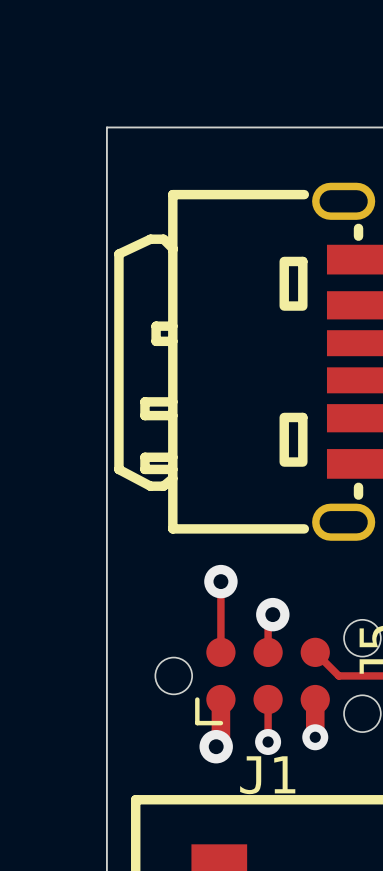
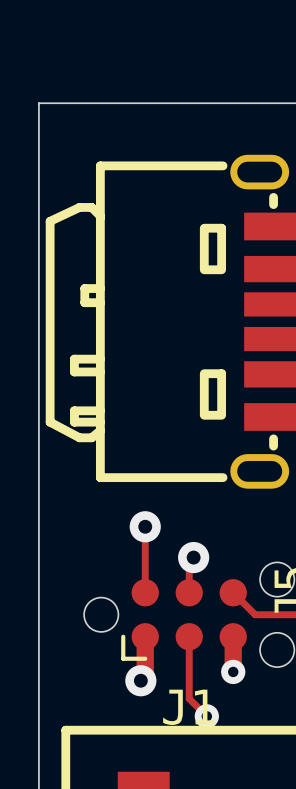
track: none -> (189, 676) (189, 698) (206, 716)
via position: (268, 741) -> (206, 716)

